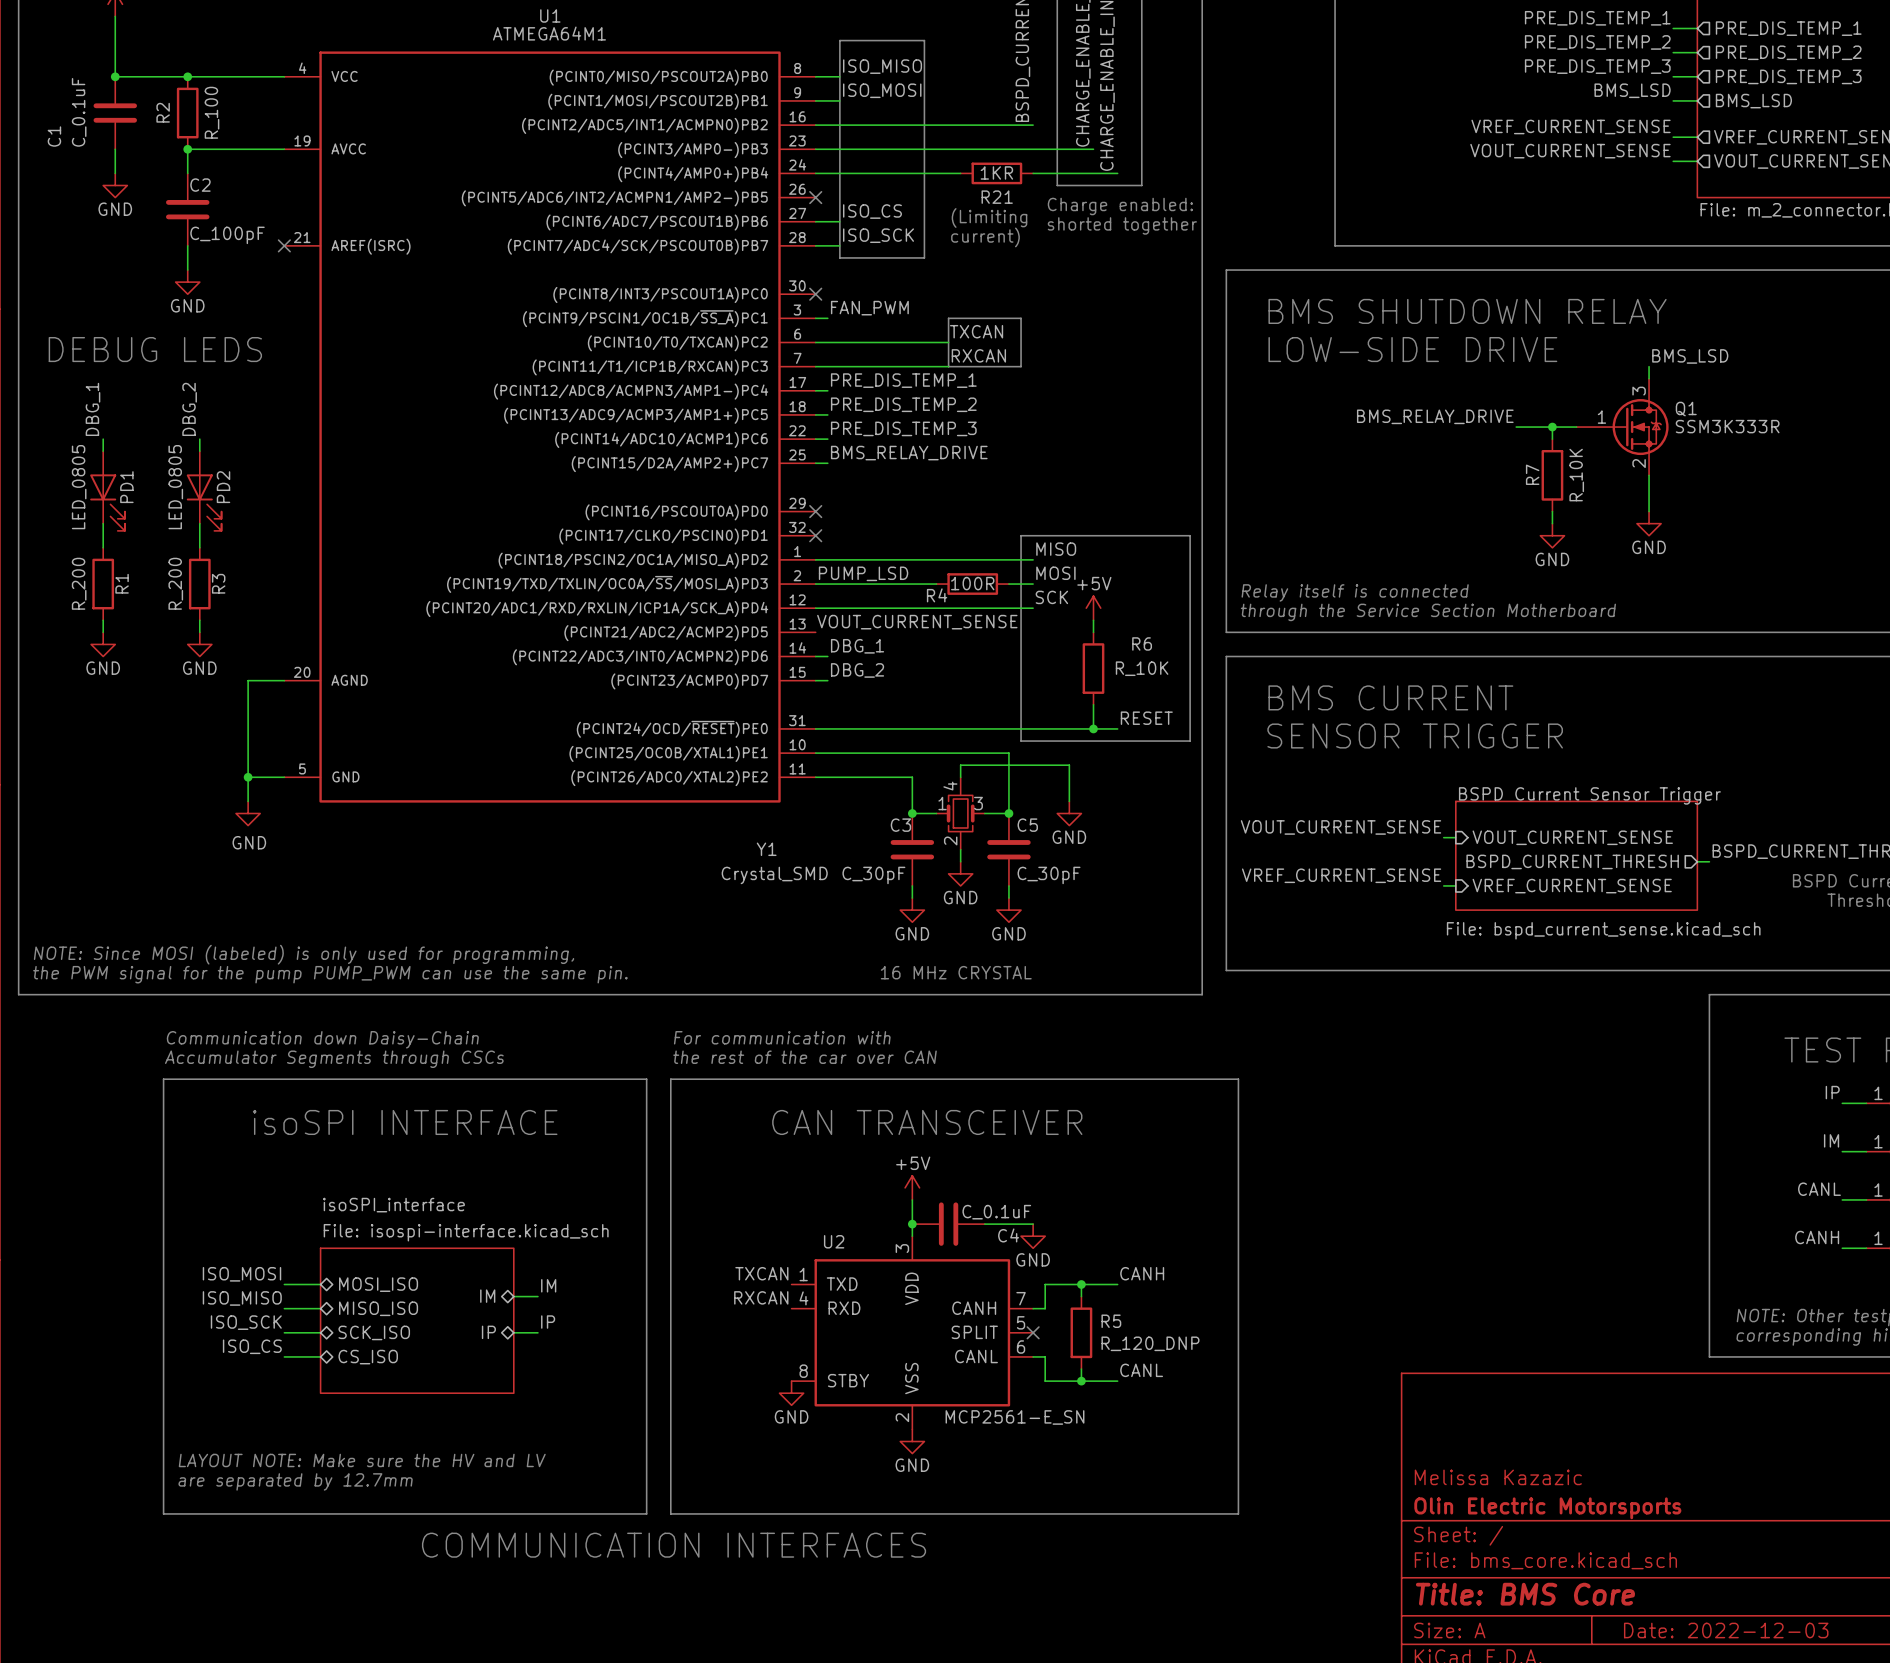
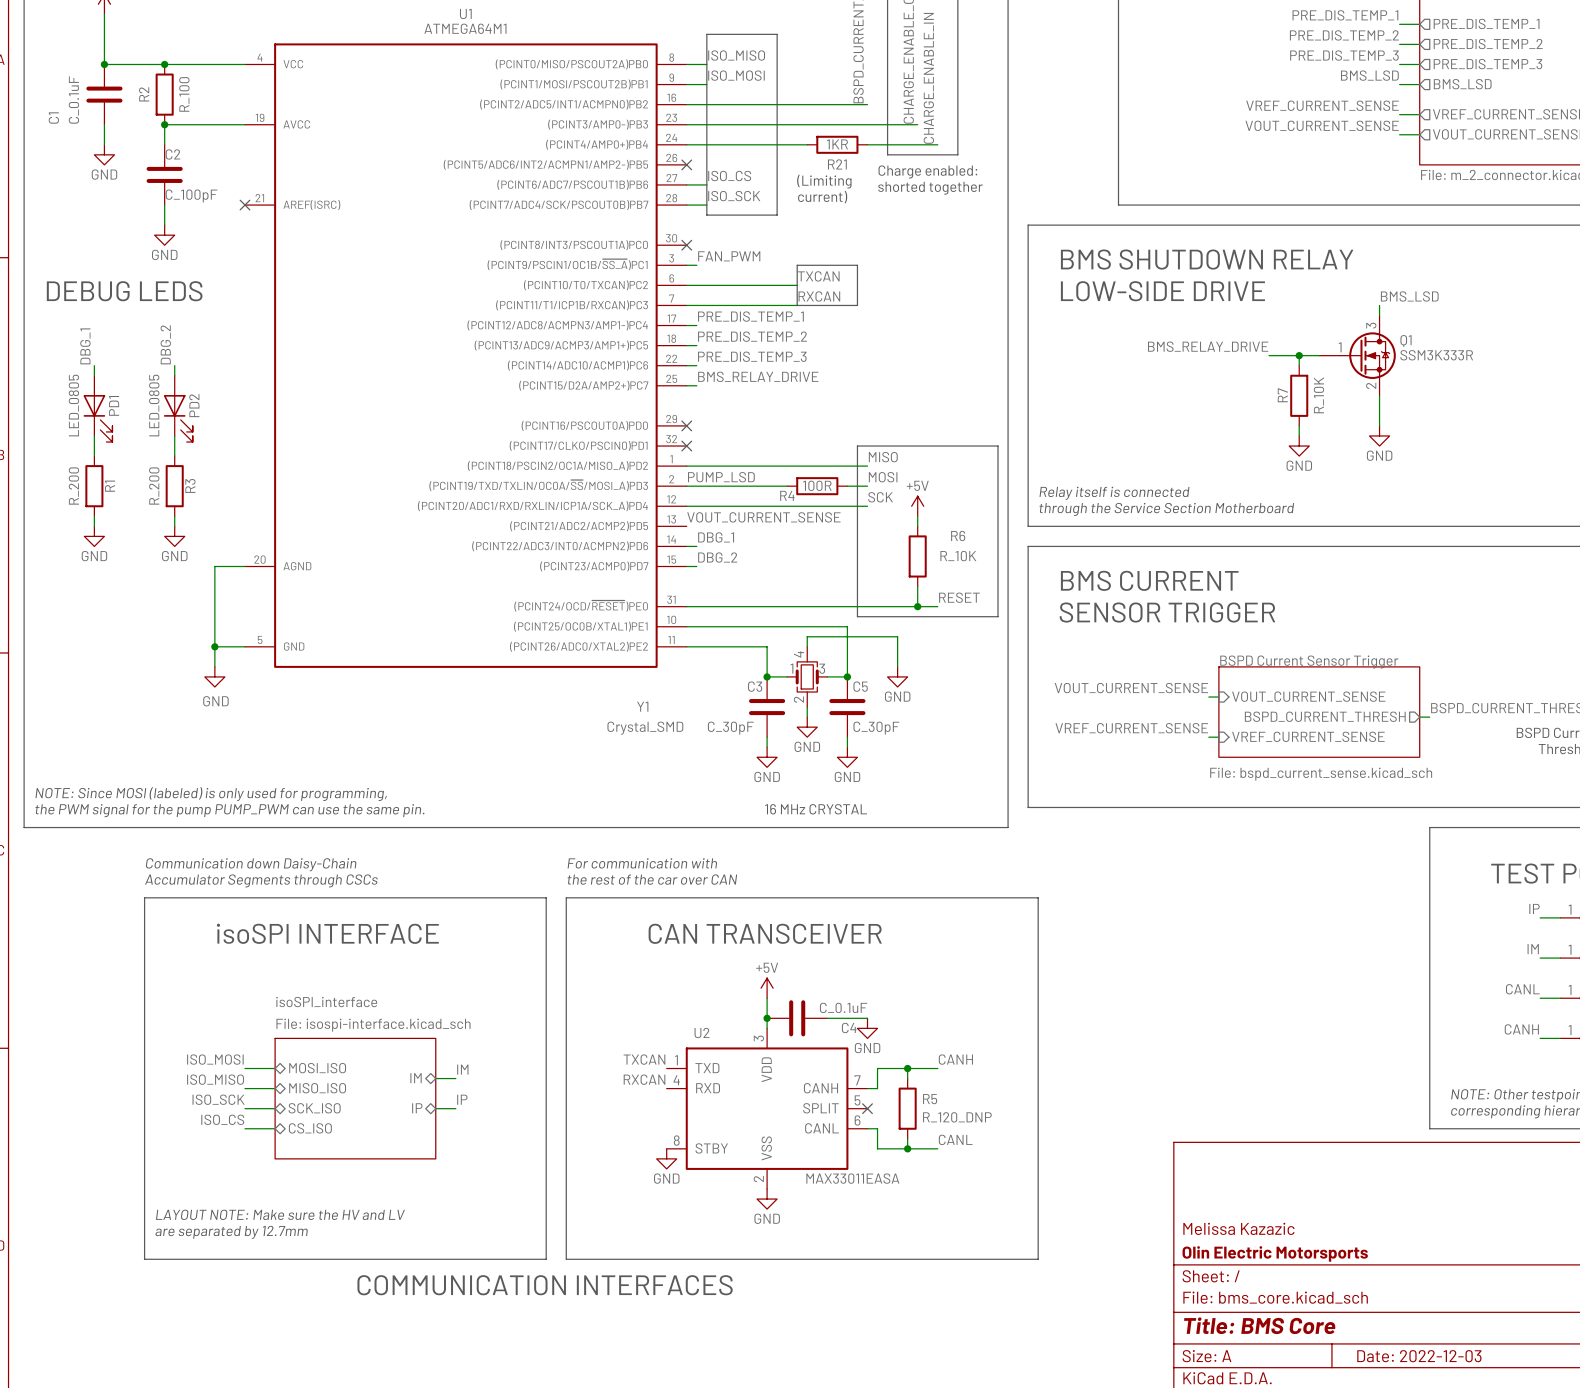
U2 value: MCP2561-E_SN (1015, 1417) -> MAX33011EASA (852, 1178)

